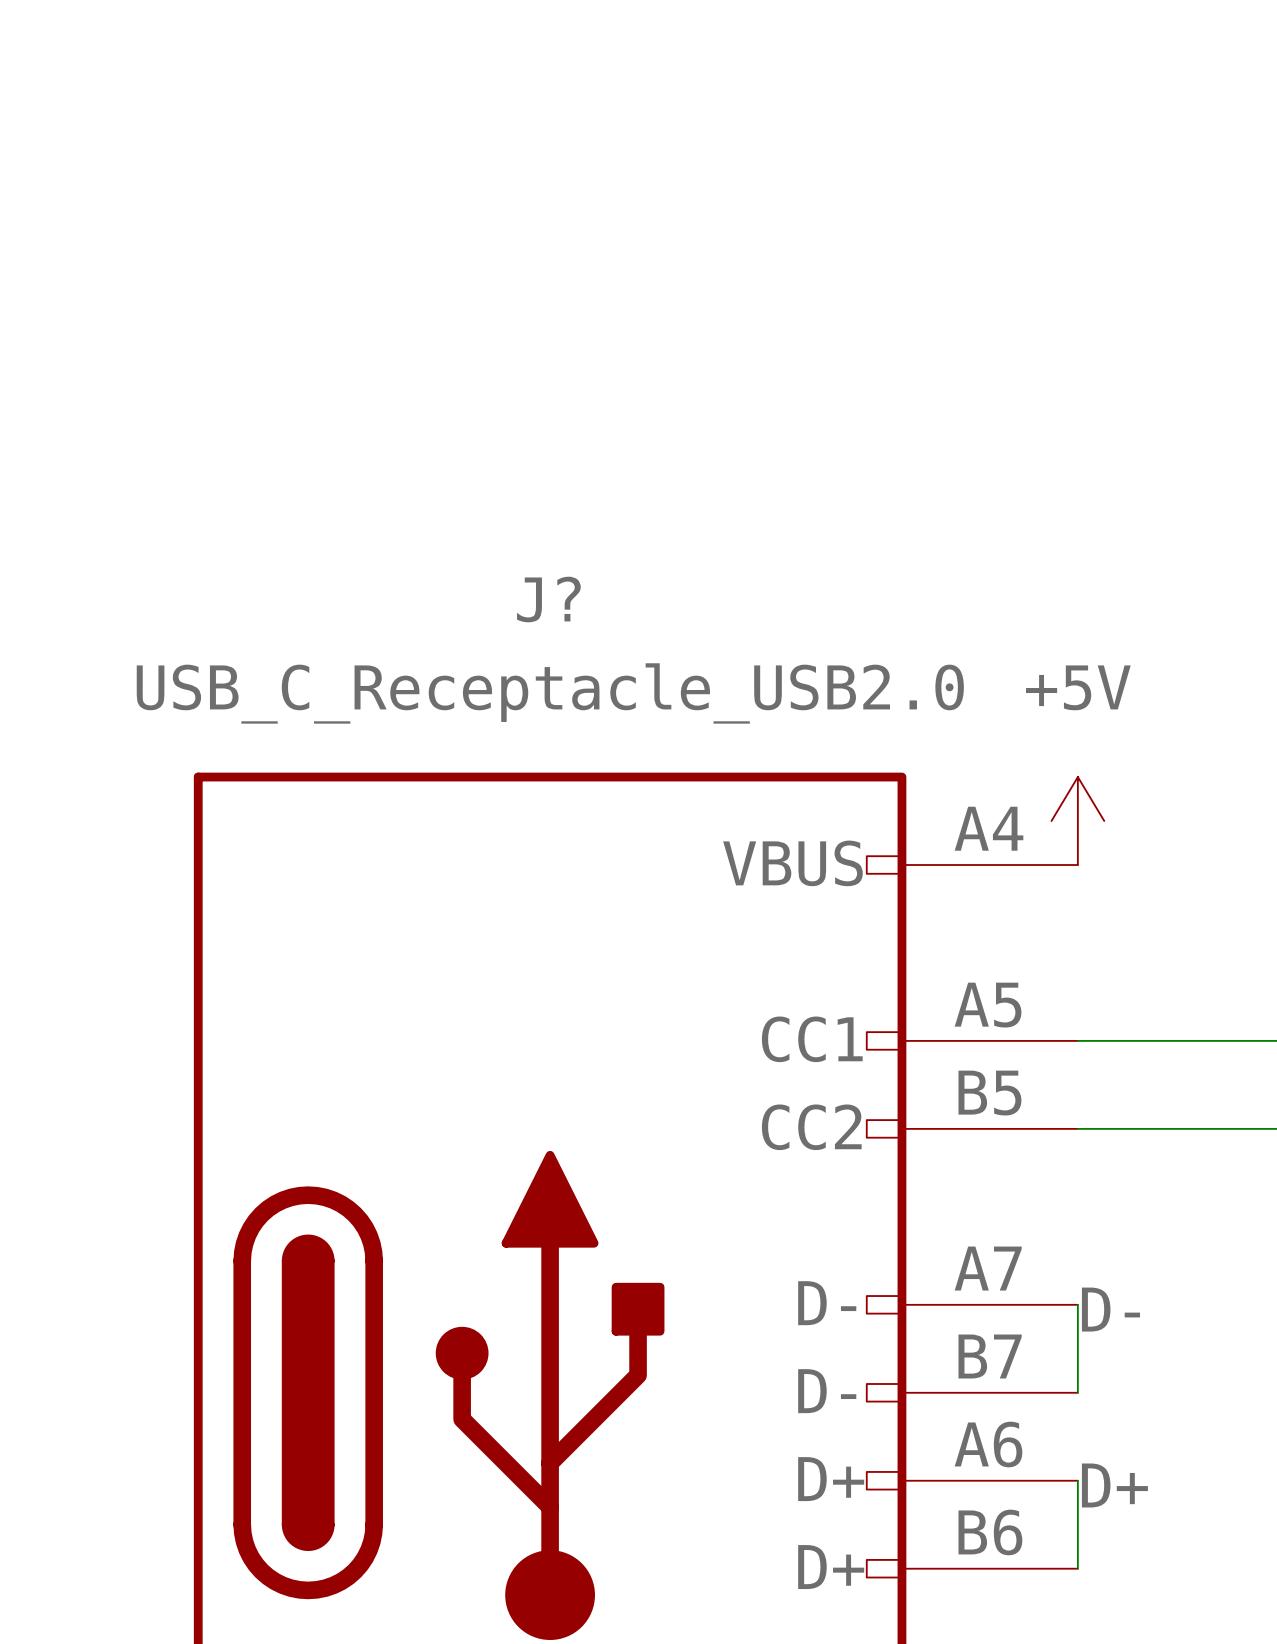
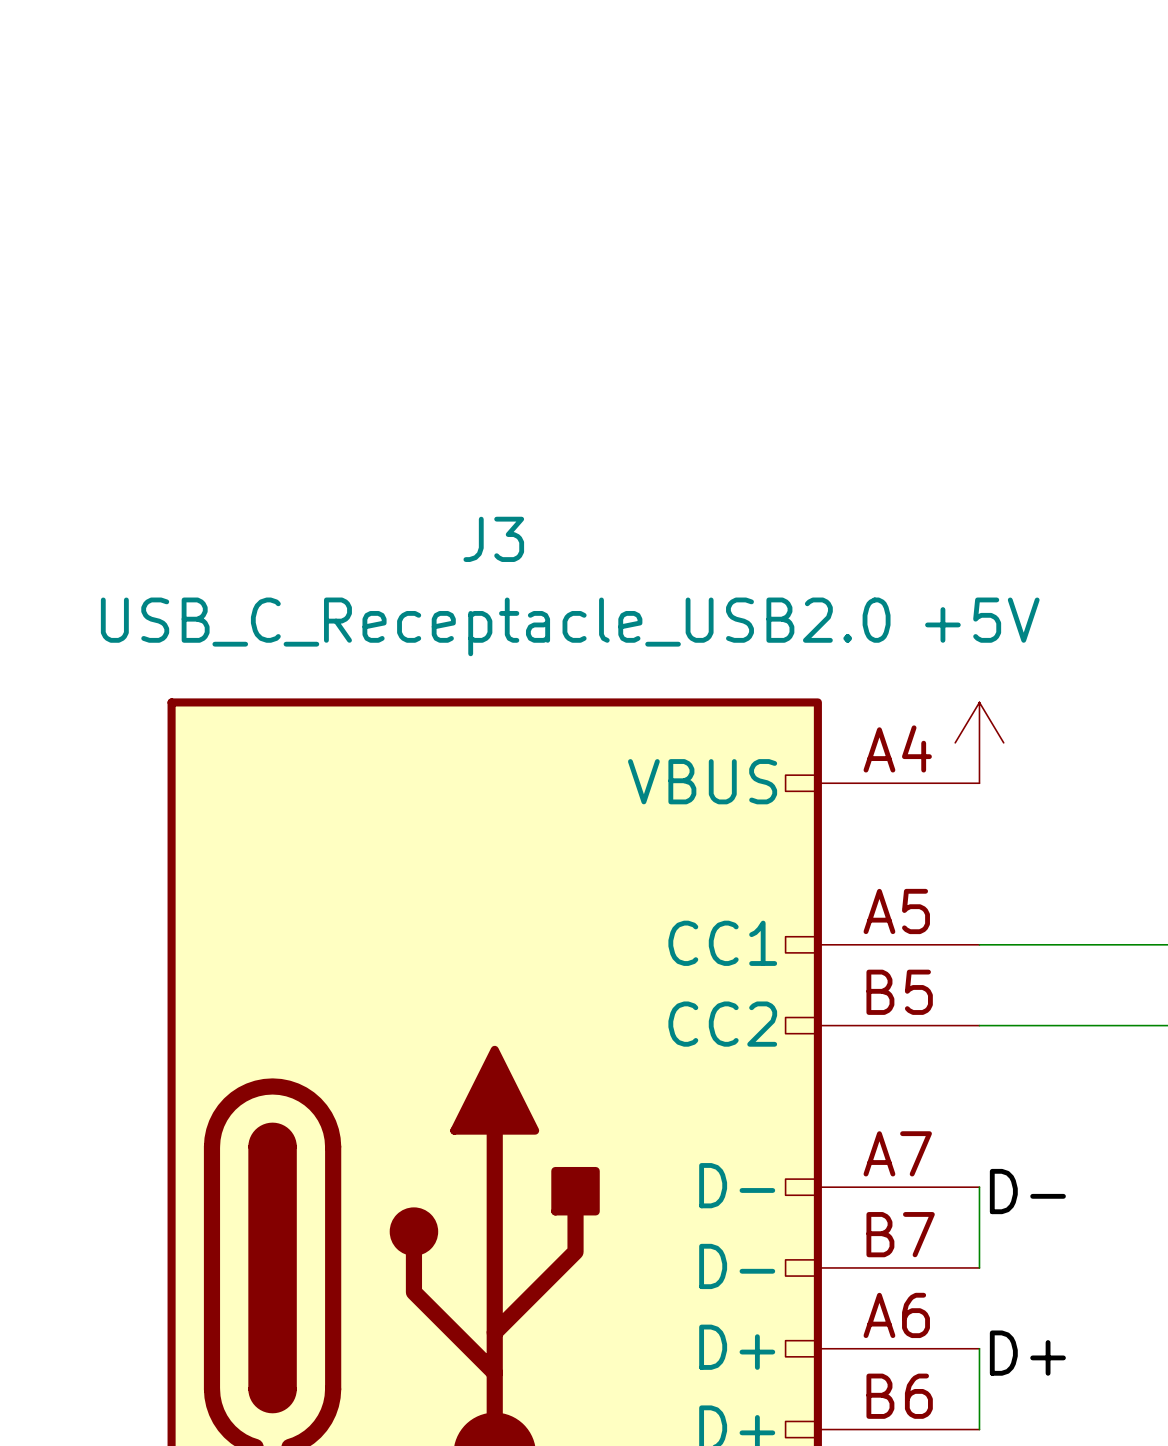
J? name: J? (548, 599) -> J3 (493, 539)

